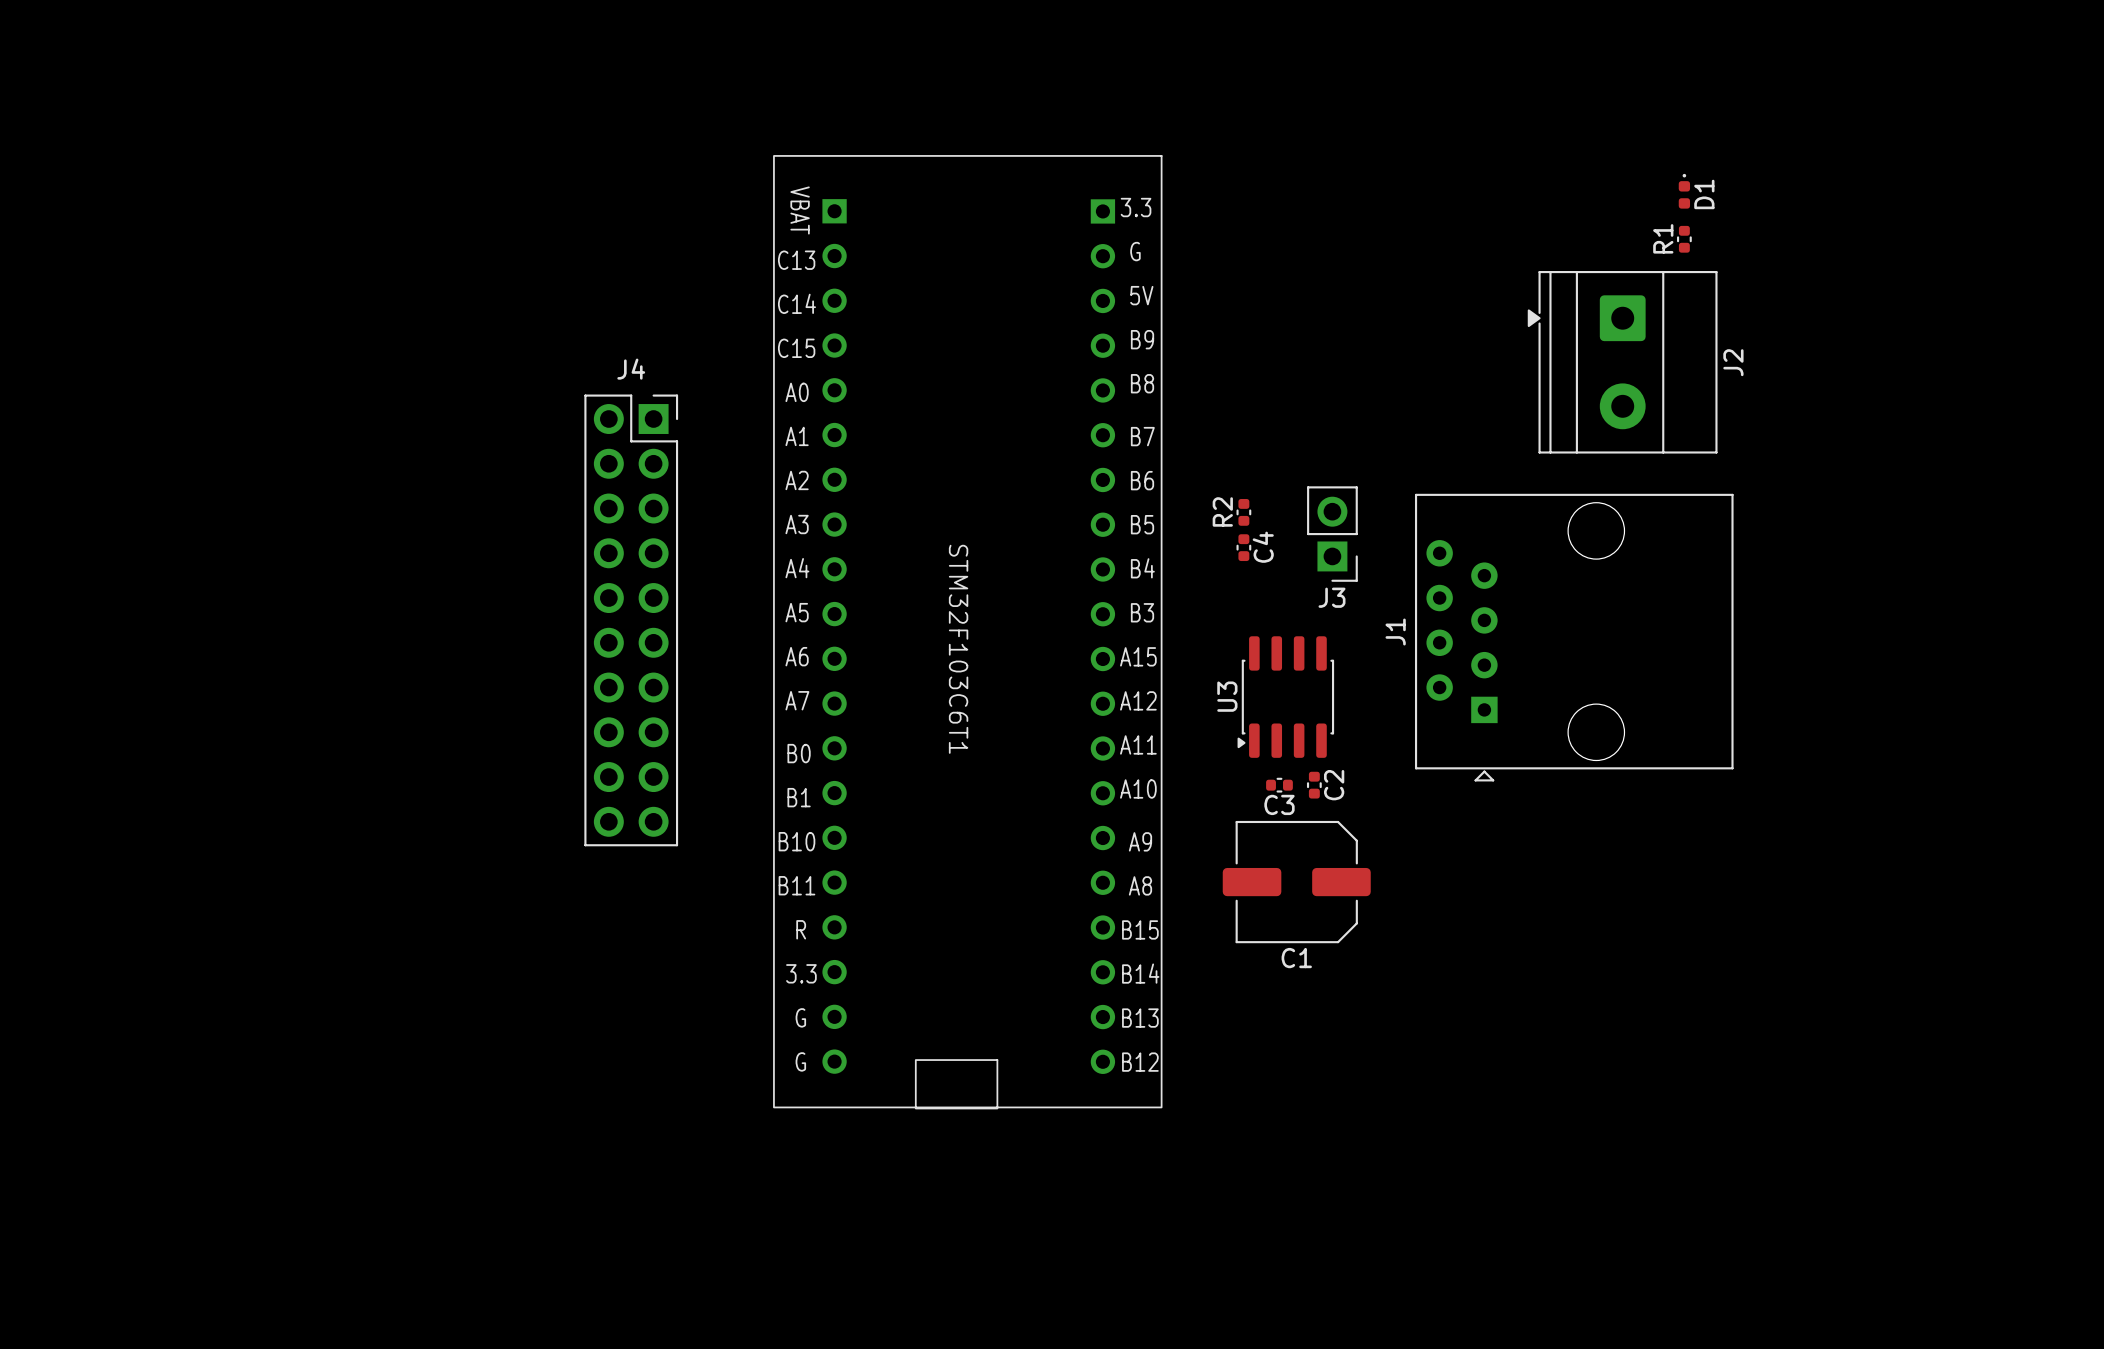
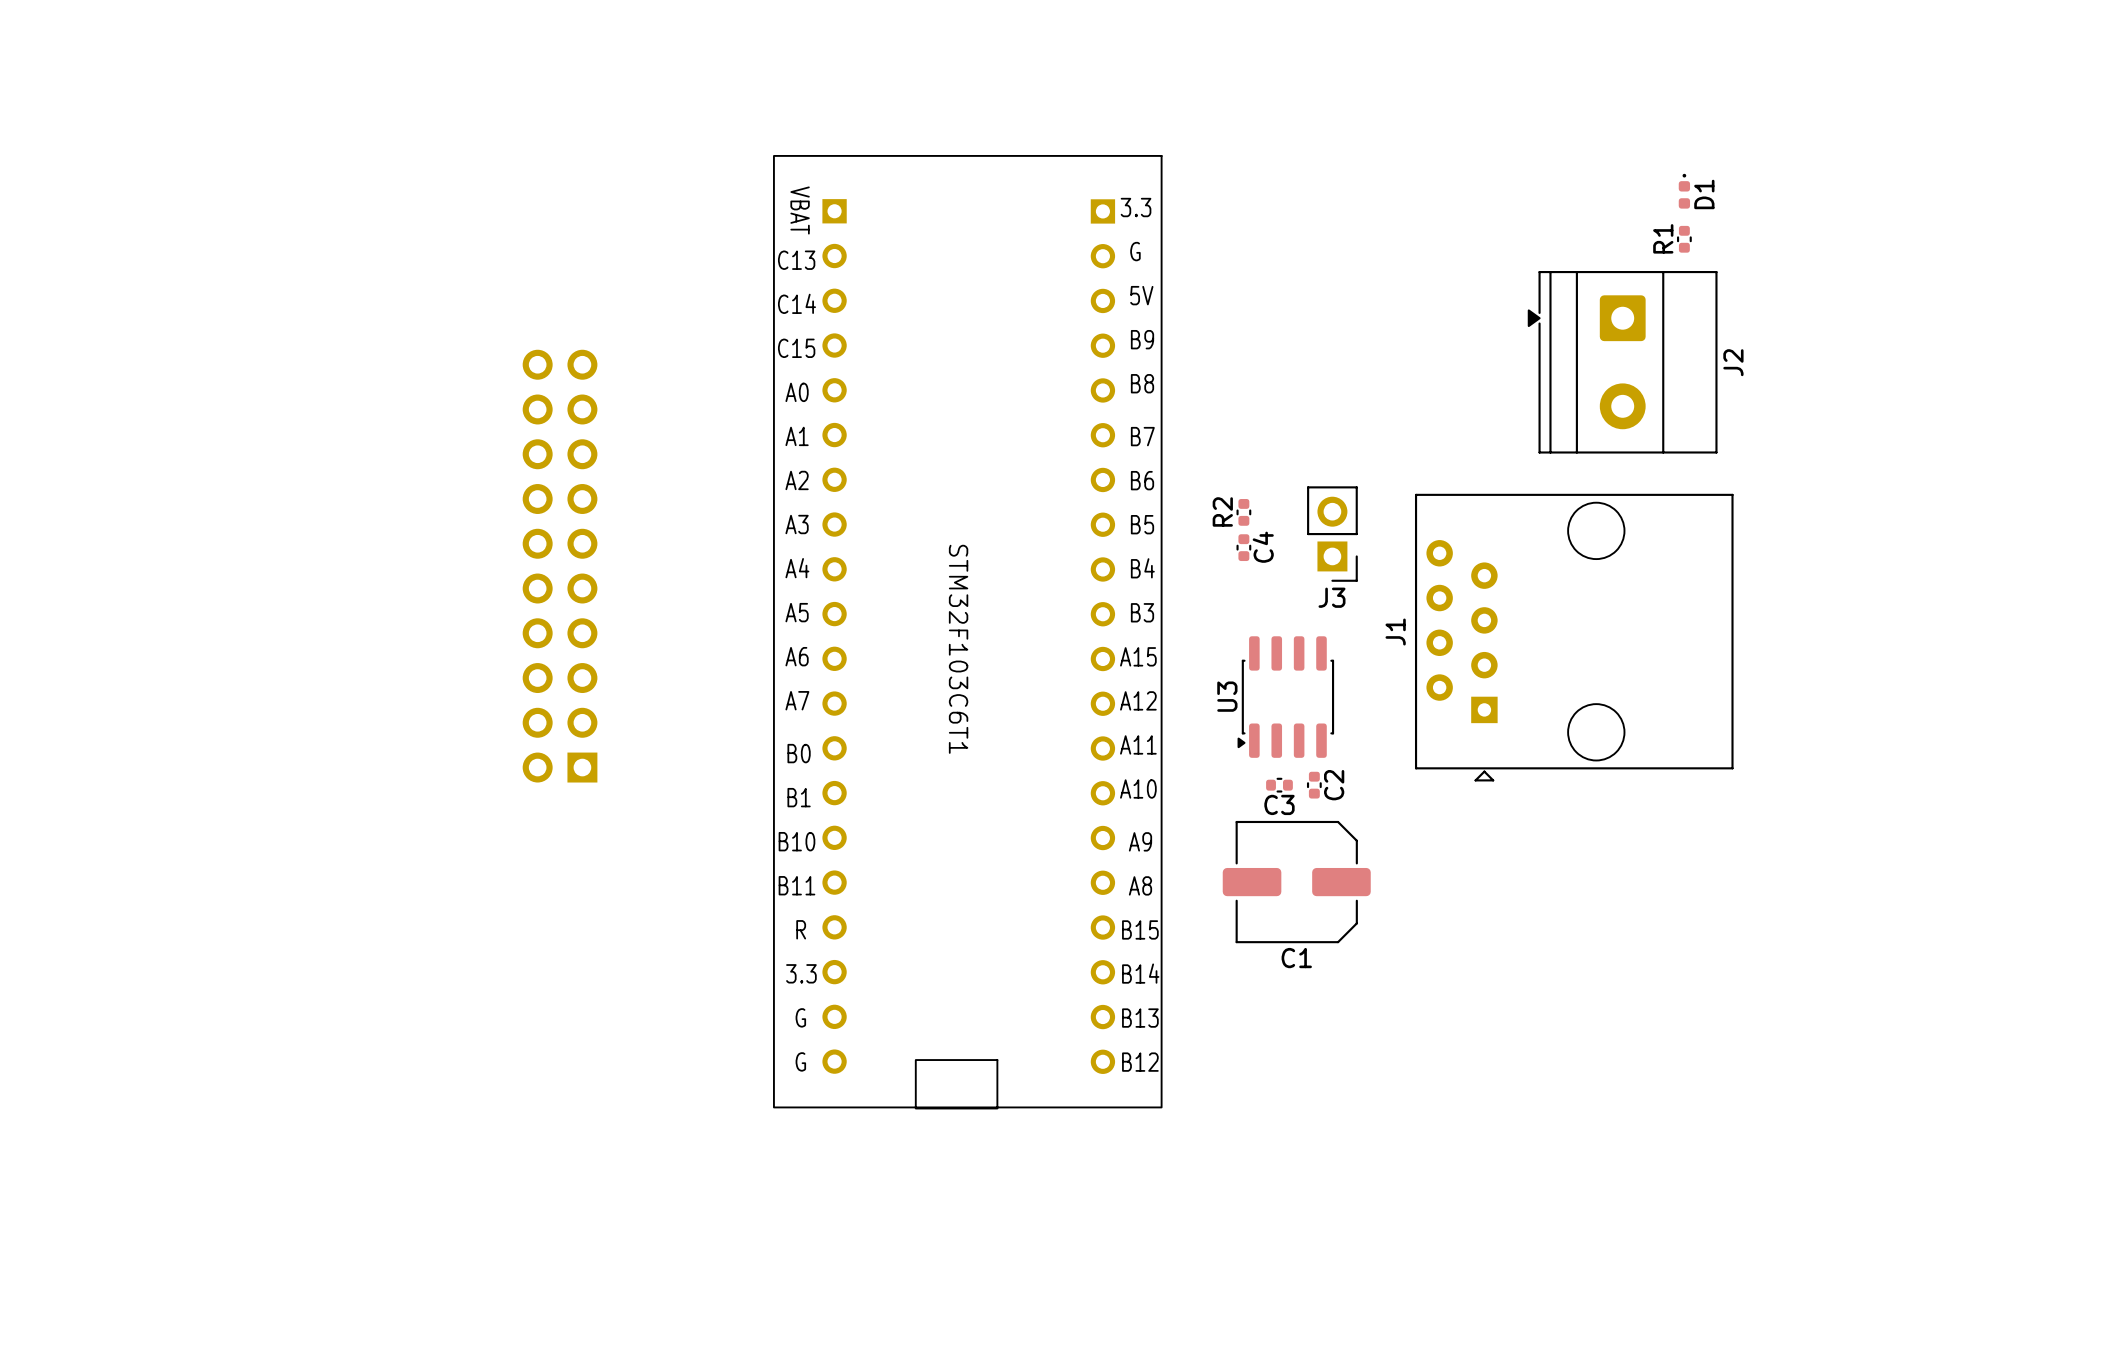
J4 side: top (631, 620) -> bottom (560, 566)

